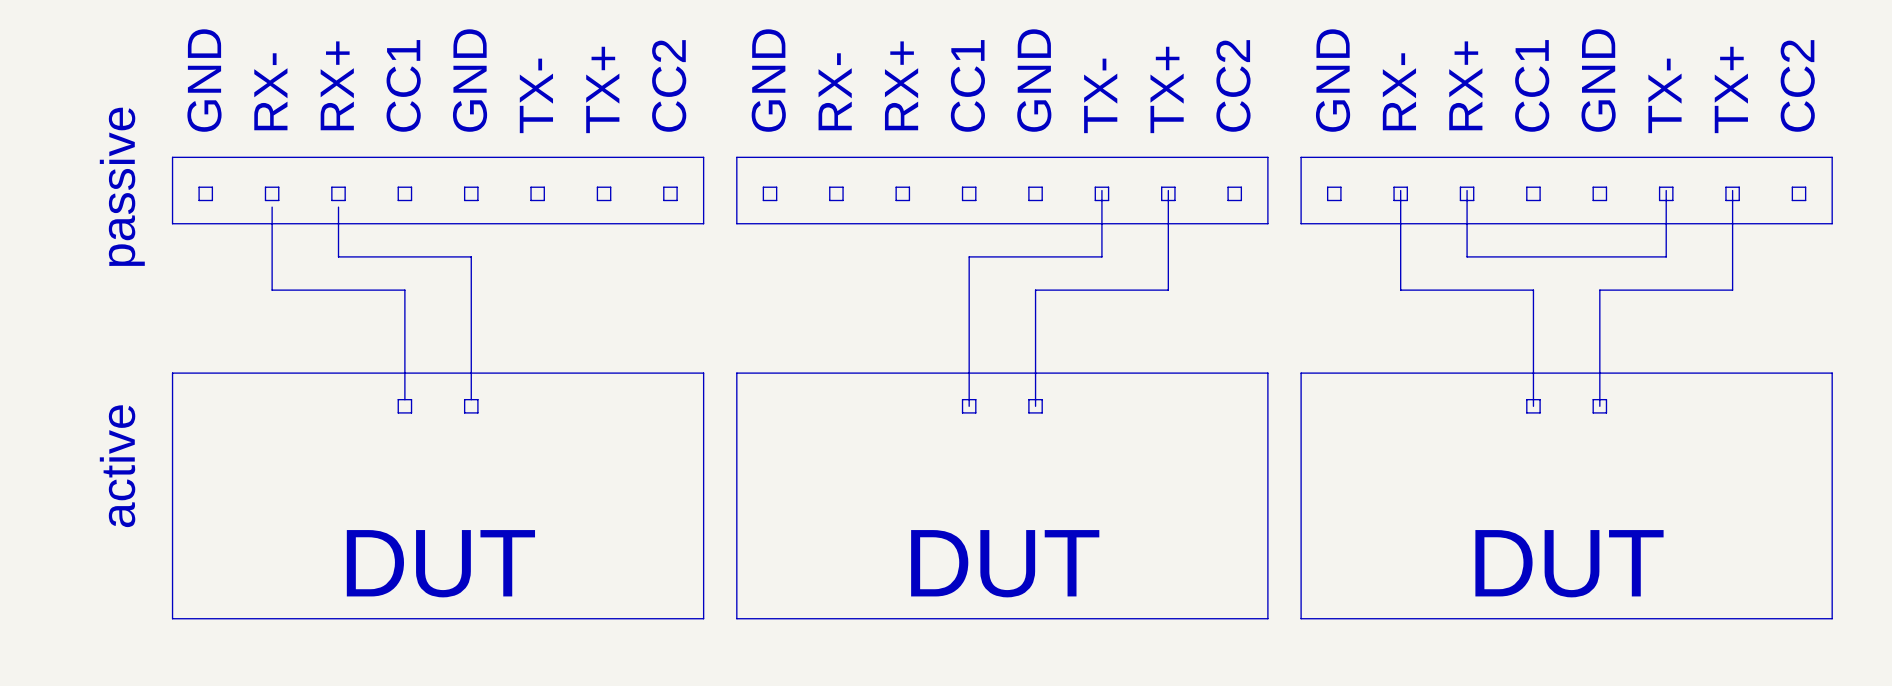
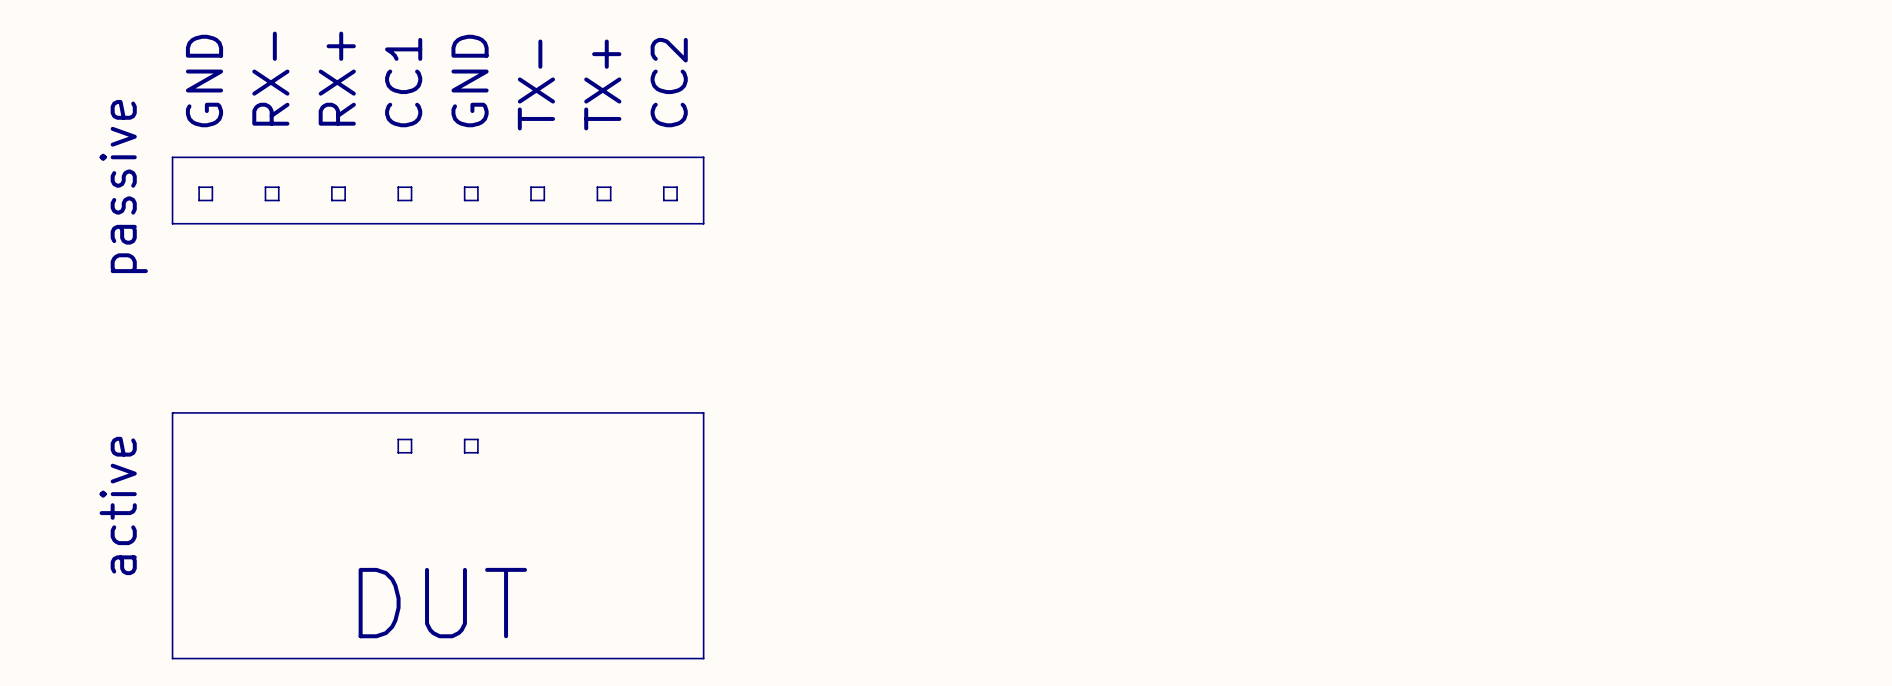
text: GND (768, 80) -> none
text: GND (1034, 80) -> none
text: GND (1333, 80) -> none
text: GND (1598, 80) -> none
text: RX+ (901, 85) -> none
text: CC1 (967, 85) -> none
text: CC2 (1233, 85) -> none
text: RX+ (1465, 85) -> none
text: CC1 (1532, 85) -> none
text: CC2 (1797, 85) -> none
text: TX+ (1167, 89) -> none
text: TX+ (1731, 89) -> none
text: RX- (835, 91) -> none
text: RX- (1399, 91) -> none
text: TX- (1100, 95) -> none
text: TX- (1664, 95) -> none
line: (736, 157) (736, 223) (1267, 223) (1267, 157) (736, 157) -> none
line: (1301, 157) (1301, 223) (1832, 223) (1832, 157) (1301, 157) -> none
line: (763, 187) (776, 187) (776, 200) (763, 200) (763, 187) -> (398, 439) (411, 439) (411, 452) (398, 452) (398, 439)
line: (829, 187) (843, 187) (843, 200) (829, 200) (829, 187) -> (464, 439) (477, 439) (477, 452) (464, 452) (464, 439)
line: (896, 187) (909, 187) (909, 200) (896, 200) (896, 187) -> none
line: (962, 187) (975, 187) (975, 200) (962, 200) (962, 187) -> none
line: (1028, 187) (1042, 187) (1042, 200) (1028, 200) (1028, 187) -> none
line: (1095, 187) (1108, 187) (1108, 200) (1095, 200) (1095, 187) -> none
line: (1161, 187) (1174, 187) (1174, 200) (1161, 200) (1161, 187) -> none
line: (1228, 187) (1241, 187) (1241, 200) (1228, 200) (1228, 187) -> none
line: (1327, 187) (1340, 187) (1340, 200) (1327, 200) (1327, 187) -> none
line: (1394, 187) (1407, 187) (1407, 200) (1394, 200) (1394, 187) -> none
line: (1460, 187) (1473, 187) (1473, 200) (1460, 200) (1460, 187) -> none
line: (1526, 187) (1540, 187) (1540, 200) (1526, 200) (1526, 187) -> none
line: (1593, 187) (1606, 187) (1606, 200) (1593, 200) (1593, 187) -> none
line: (1659, 187) (1672, 187) (1672, 200) (1659, 200) (1659, 187) -> none
line: (1725, 187) (1739, 187) (1739, 200) (1725, 200) (1725, 187) -> none
line: (1792, 187) (1805, 187) (1805, 200) (1792, 200) (1792, 187) -> none
line: (1101, 190) (1101, 256) (969, 256) (969, 406) -> none
line: (1168, 190) (1168, 290) (1035, 290) (1035, 406) -> none
line: (1400, 190) (1400, 290) (1533, 290) (1533, 406) -> none
line: (1467, 190) (1467, 256) (1666, 256) (1666, 190) -> none
line: (1732, 190) (1732, 290) (1599, 290) (1599, 406) -> none
line: (272, 207) (272, 290) (404, 290) (404, 399) -> none
line: (338, 207) (338, 256) (471, 256) (471, 399) -> none
line: (736, 373) (1267, 373) (1267, 618) (736, 618) (736, 373) -> none
line: (1301, 373) (1832, 373) (1832, 618) (1301, 618) (1301, 373) -> none
line: (962, 399) (975, 399) (975, 412) (962, 412) (962, 399) -> none
line: (1028, 399) (1042, 399) (1042, 412) (1028, 412) (1028, 399) -> none
line: (1526, 399) (1540, 399) (1540, 412) (1526, 412) (1526, 399) -> none
line: (1593, 399) (1606, 399) (1606, 412) (1593, 412) (1593, 399) -> none
line: (172, 412) (172, 373) (703, 373) (703, 412) -> (172, 412) (398, 412)
line: (398, 412) (398, 399) (411, 399) (411, 412) -> (464, 412) (411, 412)
line: (464, 412) (464, 399) (477, 399) (477, 412) -> (703, 412) (477, 412)
text position: active (117, 466) -> active (118, 505)
text position: DUT (440, 563) -> DUT (442, 603)
text: DUT (1005, 563) -> none
text: DUT (1569, 563) -> none
line: (172, 618) (703, 618) -> (172, 618) (172, 658) (703, 658) (703, 618)

